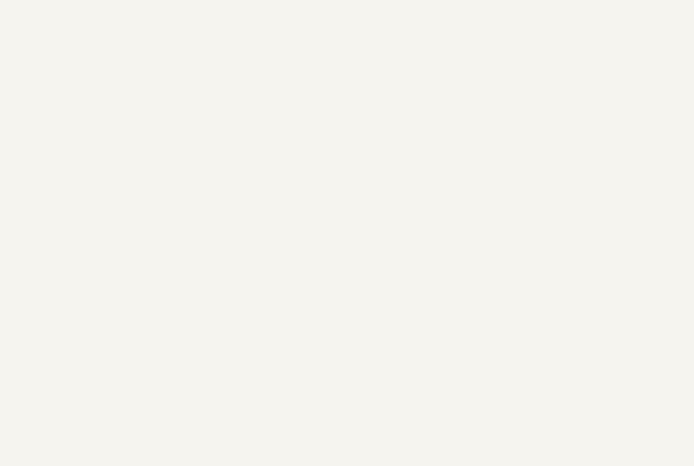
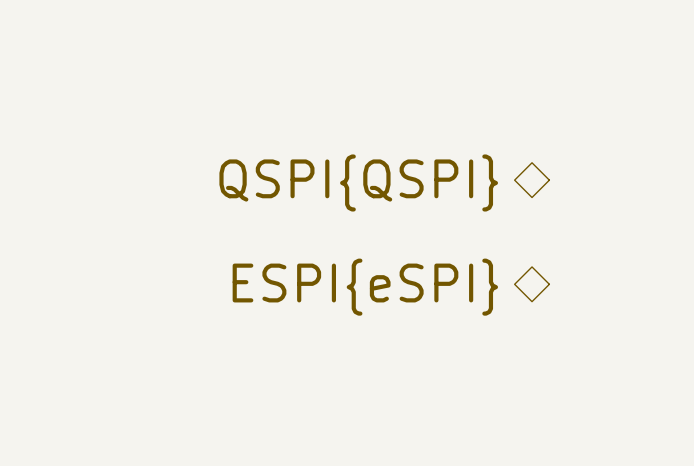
hierarchical label: none -> QSPI{QSPI} (358, 182)
hierarchical label: none -> ESPI{eSPI} (365, 287)

